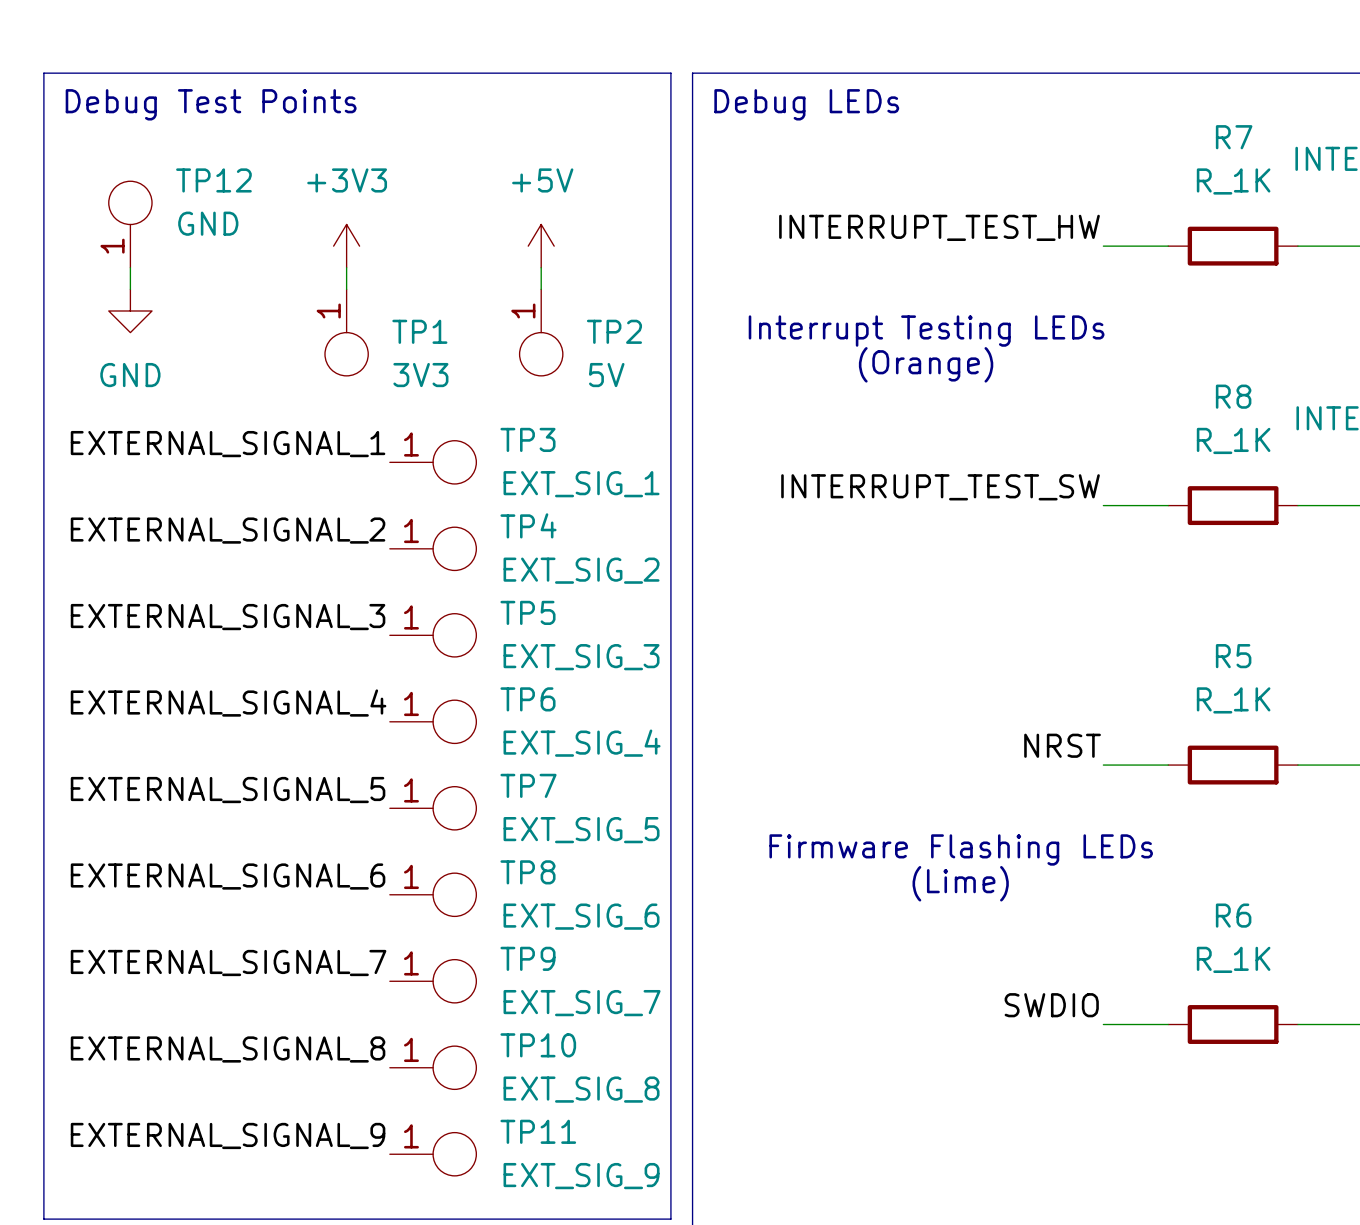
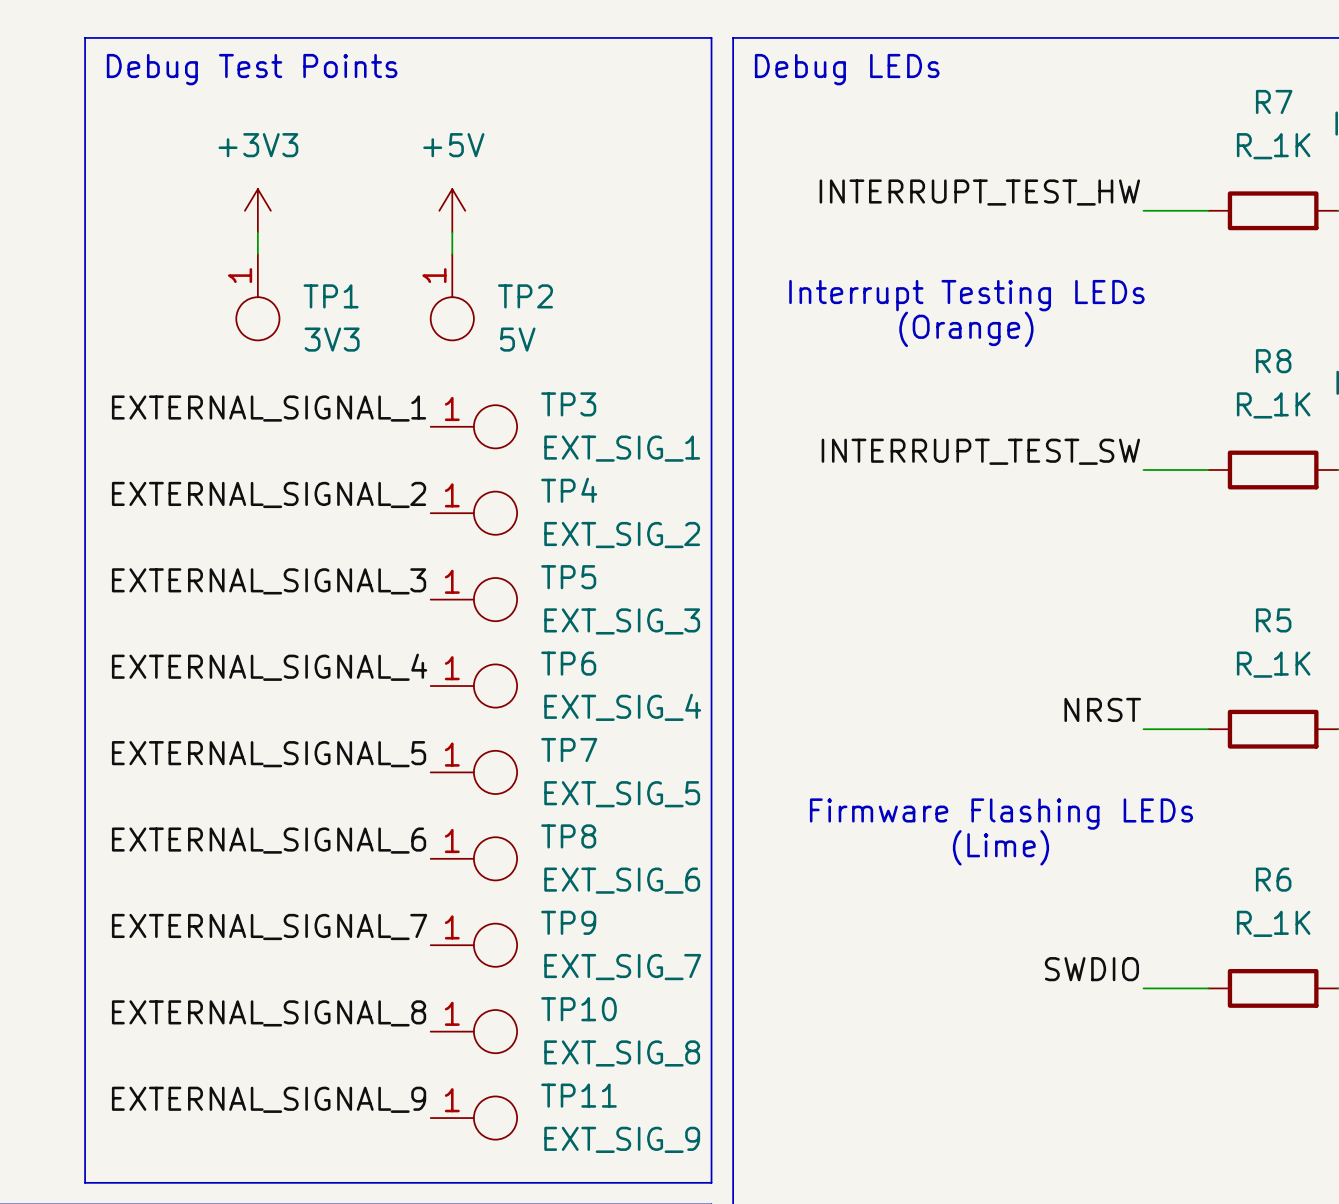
TP12: GND (130, 224) -> none
power symbol position: +3V3 (346, 246) -> +3V3 (257, 210)
power symbol position: +5V (541, 246) -> +5V (452, 210)
wire: (130, 267) (130, 289) -> (257, 232) (257, 253)
wire: (346, 267) (346, 289) -> (452, 232) (452, 253)
wire: (541, 267) (541, 289) -> none
power symbol: GND (130, 310) -> none
TP1 position: (346, 332) -> (257, 297)
TP2 position: (541, 332) -> (452, 297)

